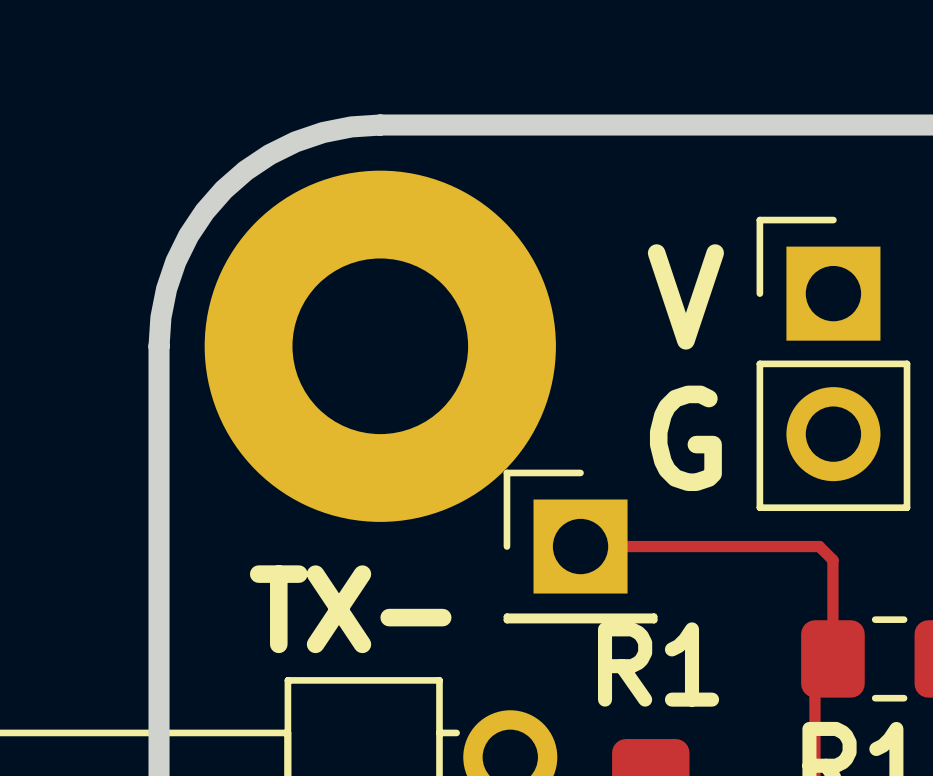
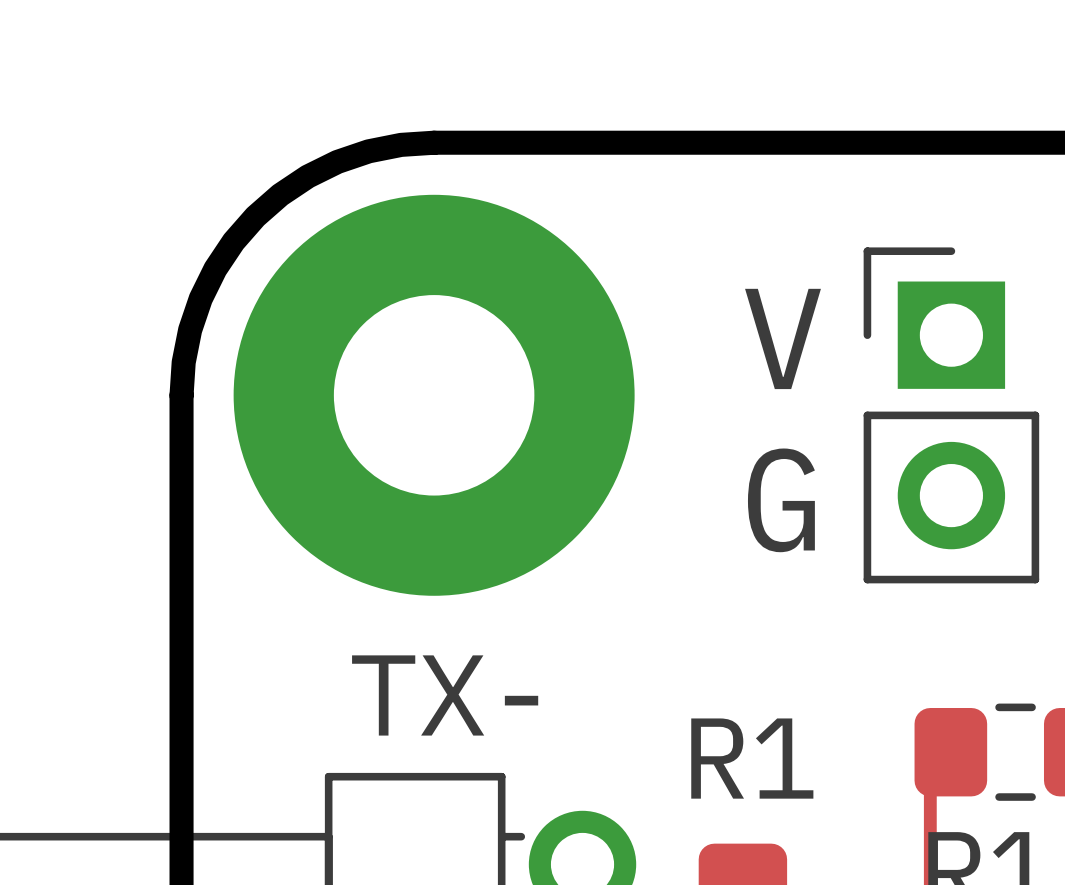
top track: (580, 546) (819, 546) (832, 560) (832, 658) -> none
part: (580, 546) -> none
text position: TX- (350, 609) -> TX- (445, 695)

